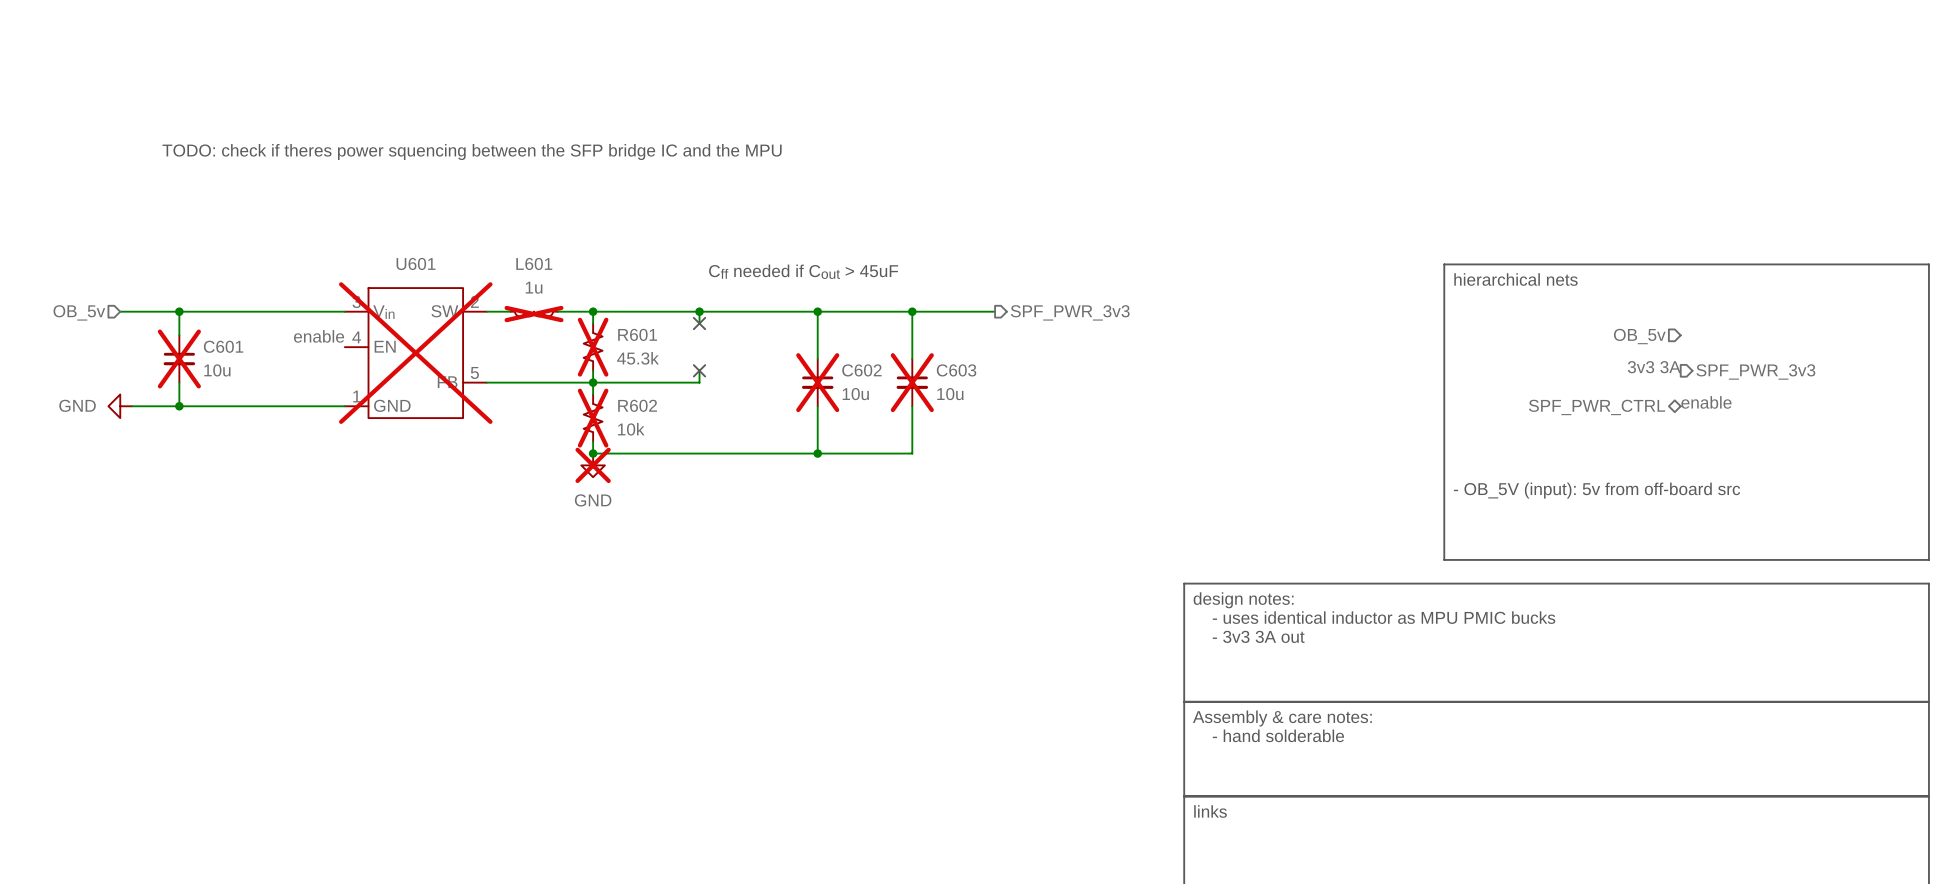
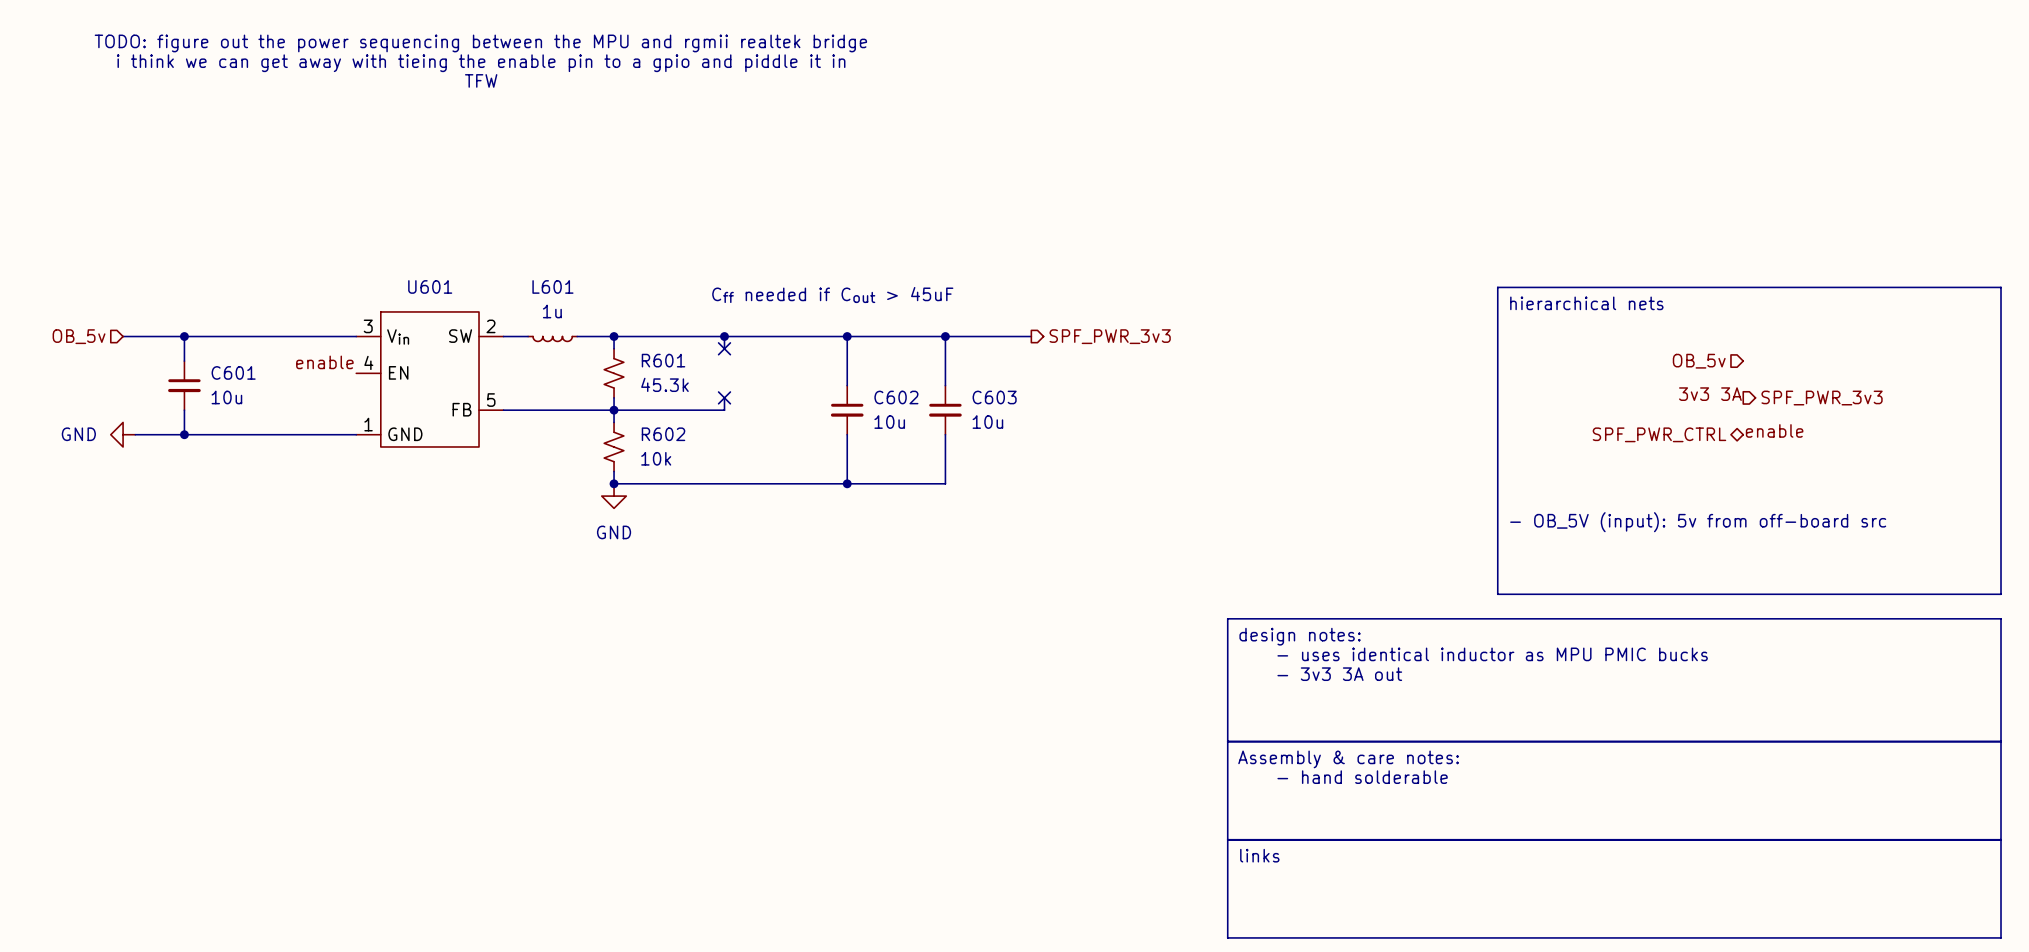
text: none -> TODO: figure out the power sequencing between the MPU and rgmii realtek bridge (480, 43)
text: none -> i think we can get away with tieing the enable pin to a gpio and piddle it in (481, 63)
text: none -> TFW (481, 80)
text: TODO: check if theres power squencing between the SFP bridge IC and the MPU (472, 151) -> none
L601 do-not-place cross: (534, 314) -> none
R601 do-not-place cross: (593, 347) -> none
U601 do-not-place cross: (415, 353) -> none
C601 do-not-place cross: (179, 358) -> none
C602 do-not-place cross: (817, 382) -> none
C603 do-not-place cross: (912, 382) -> none
R602 do-not-place cross: (593, 418) -> none
power symbol do-not-place cross: (593, 465) -> none

